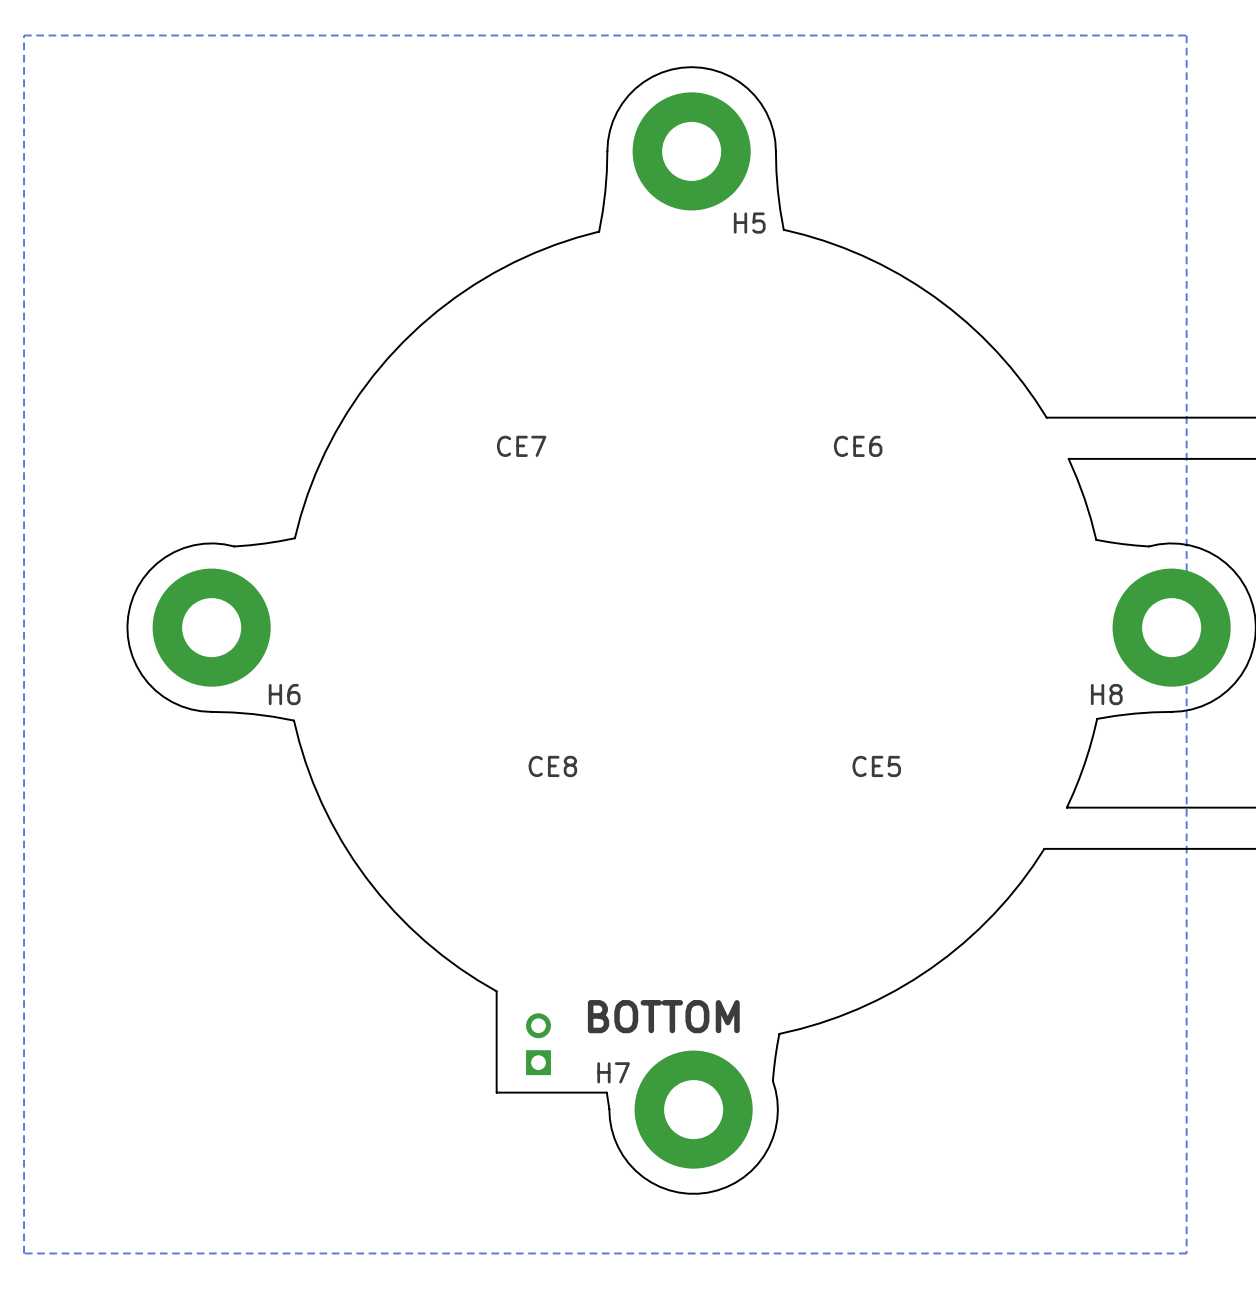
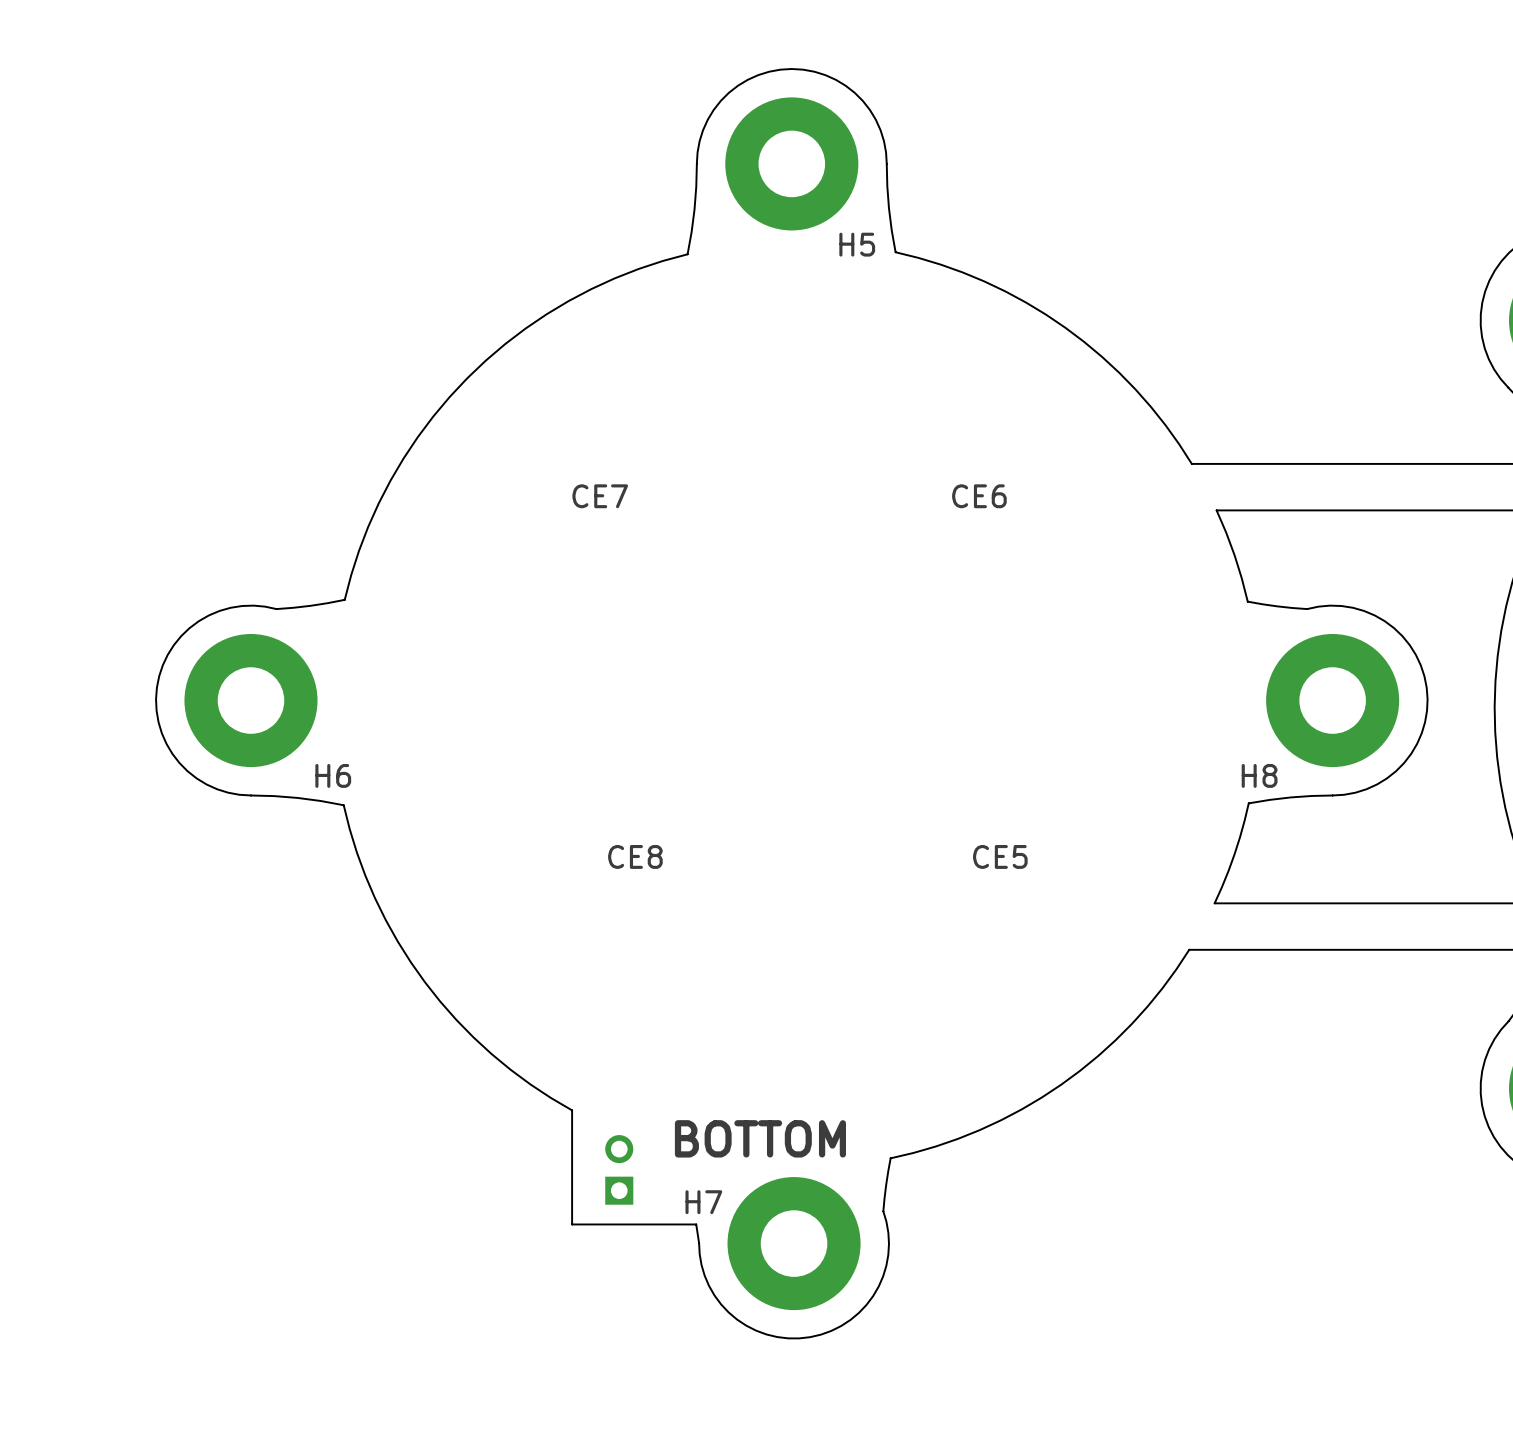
zone outline: (1186, 35) (1186, 1253) (24, 1253) (24, 35) (1186, 35) -> none

